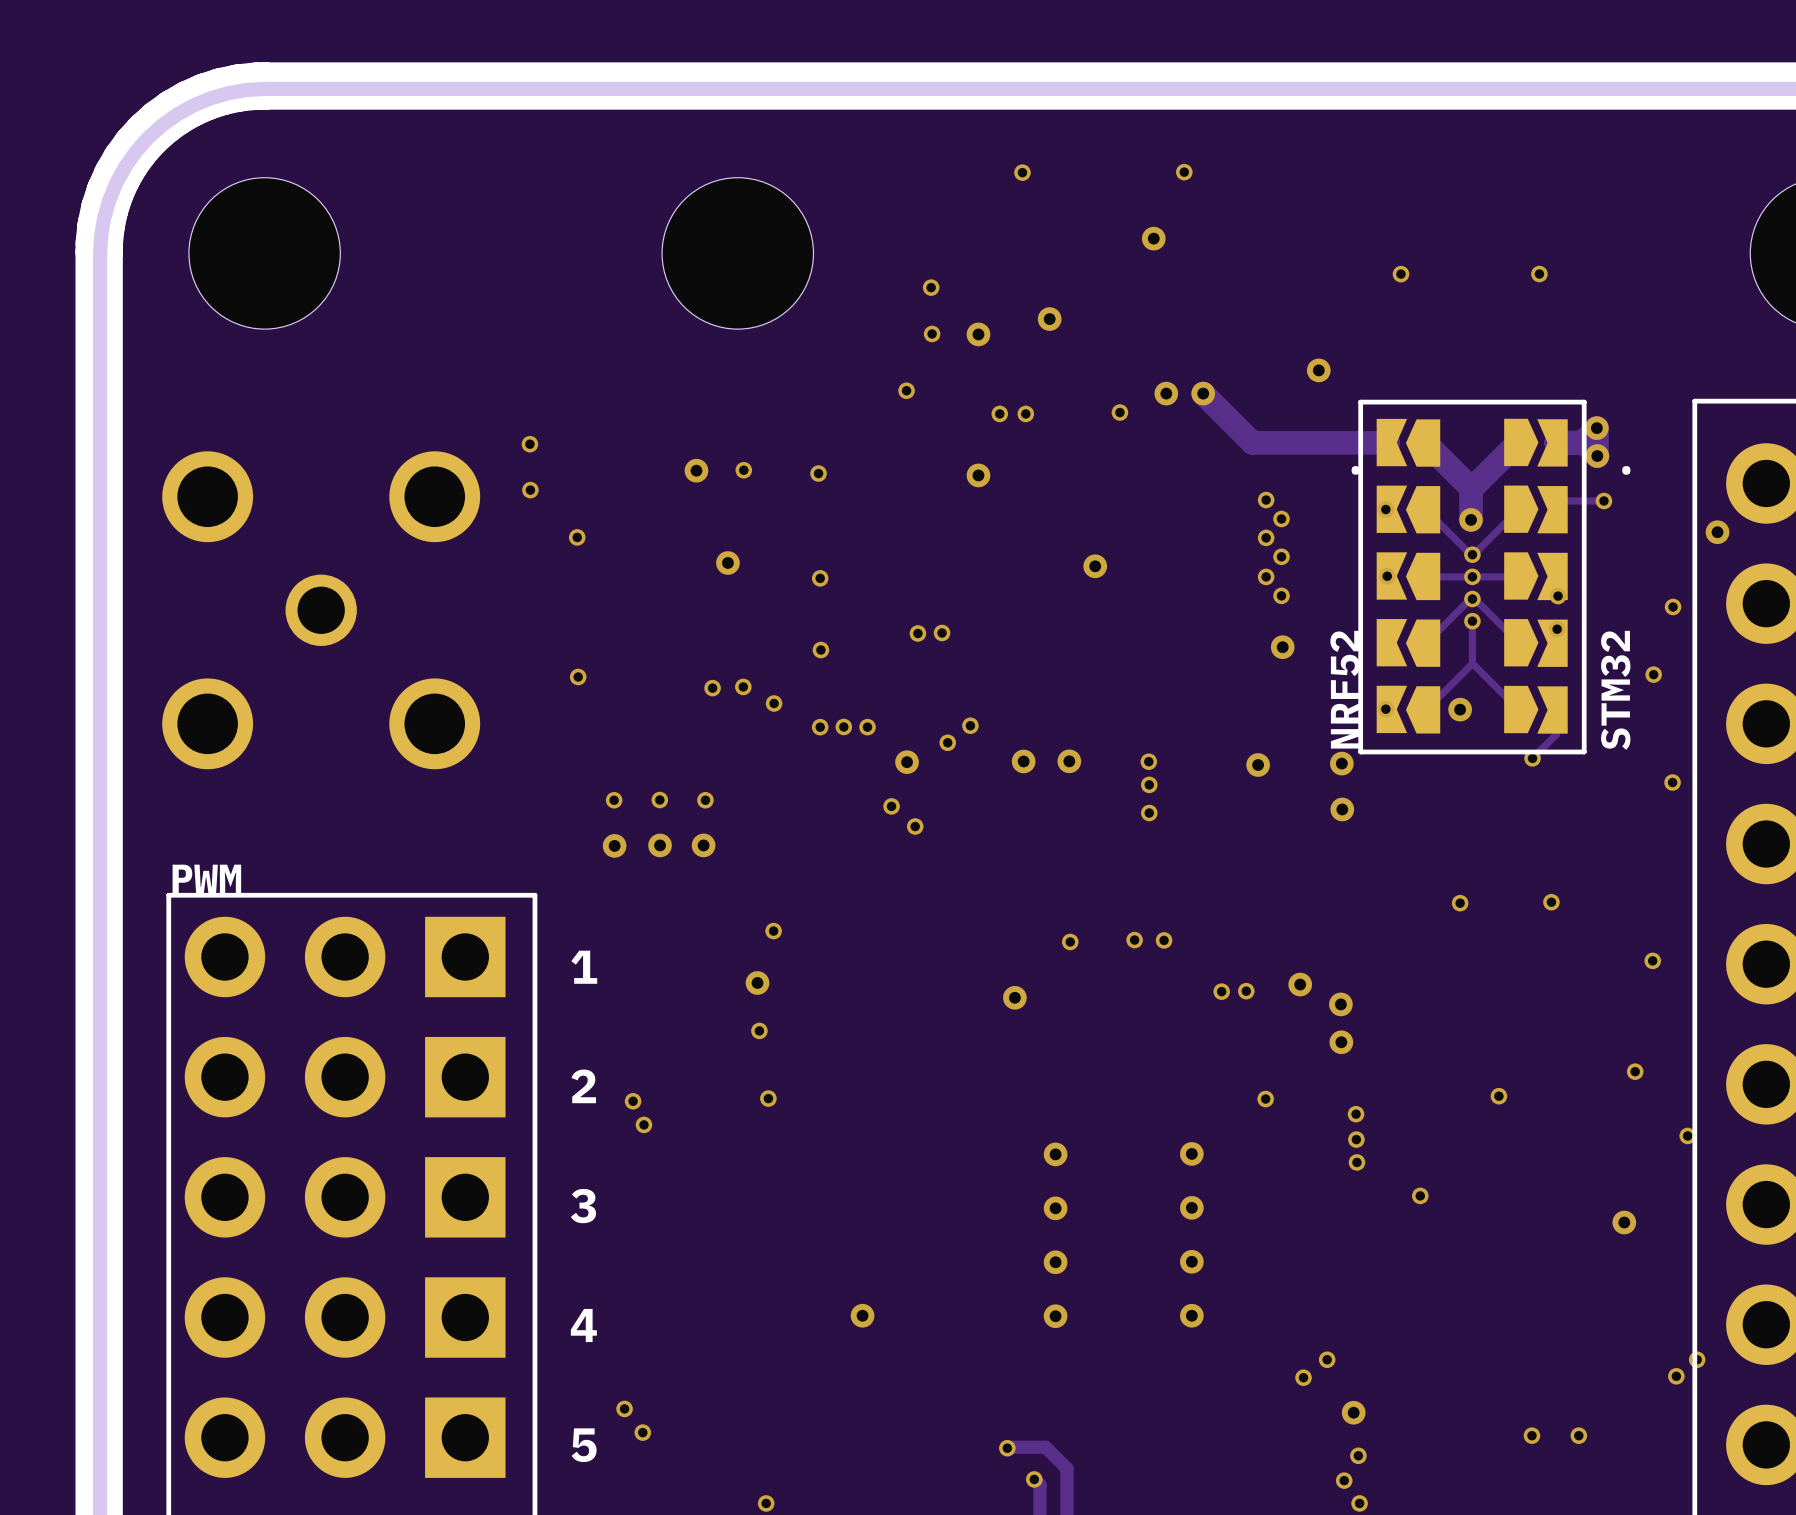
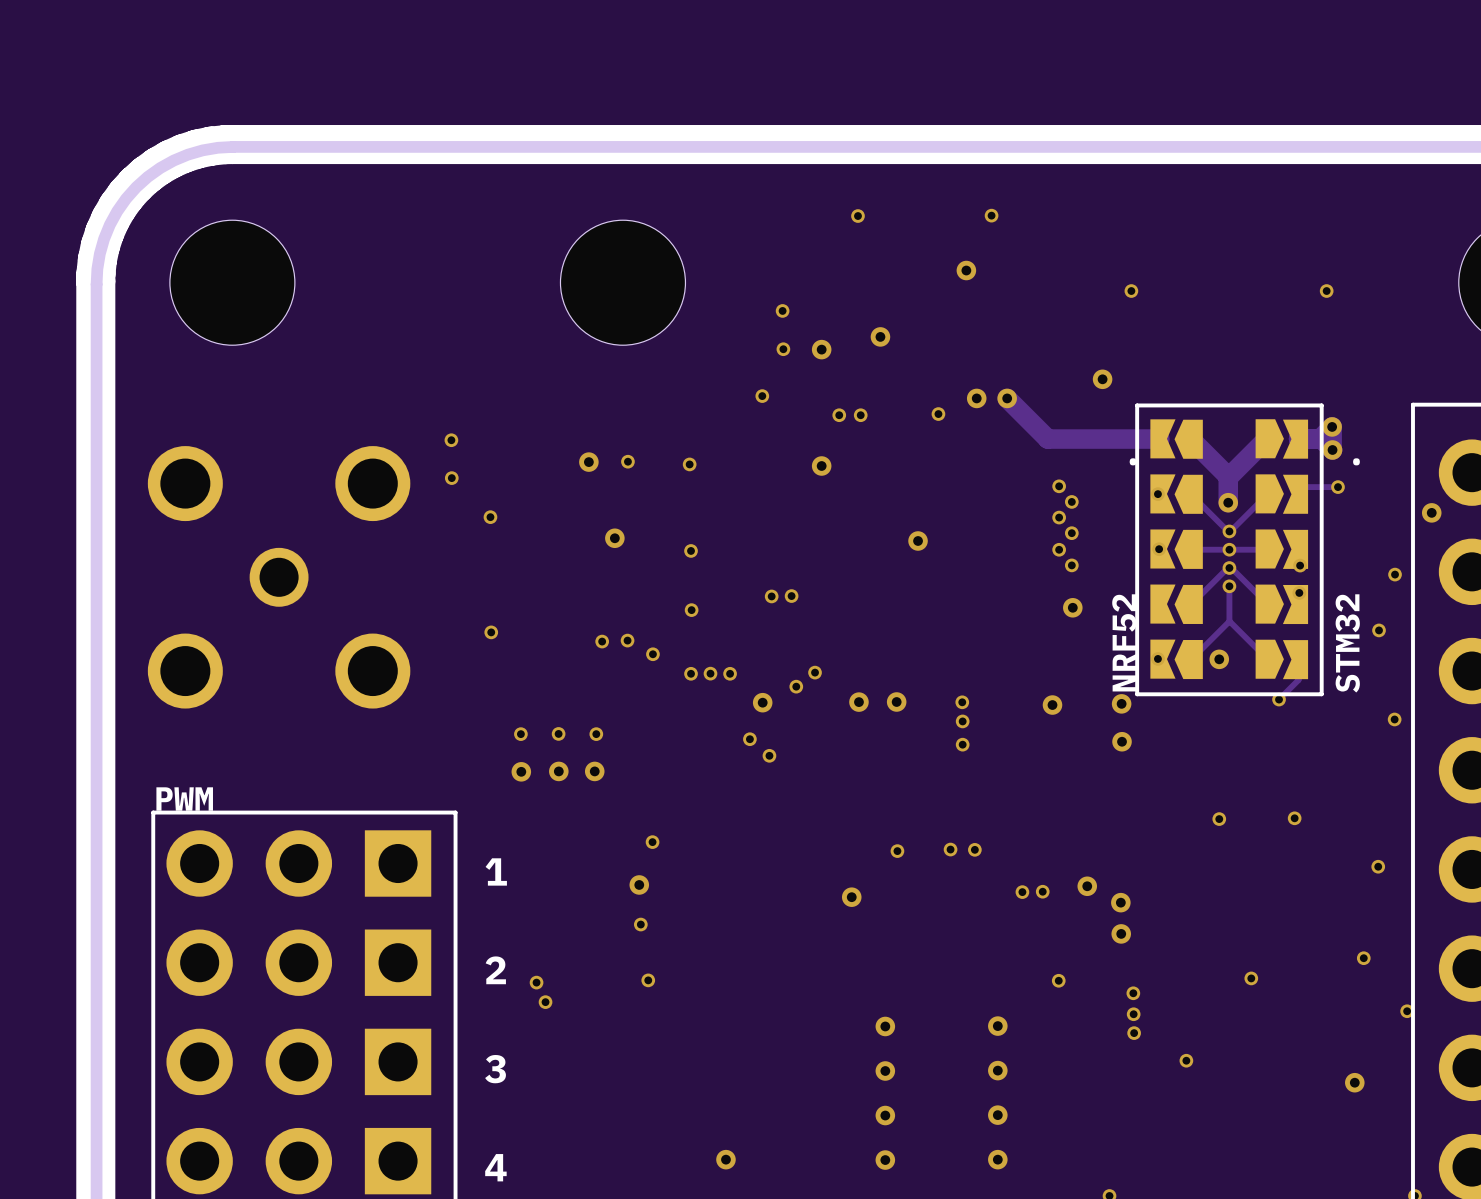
via position: (1400, 274) -> (1131, 291)
via position: (1539, 274) -> (1326, 291)

